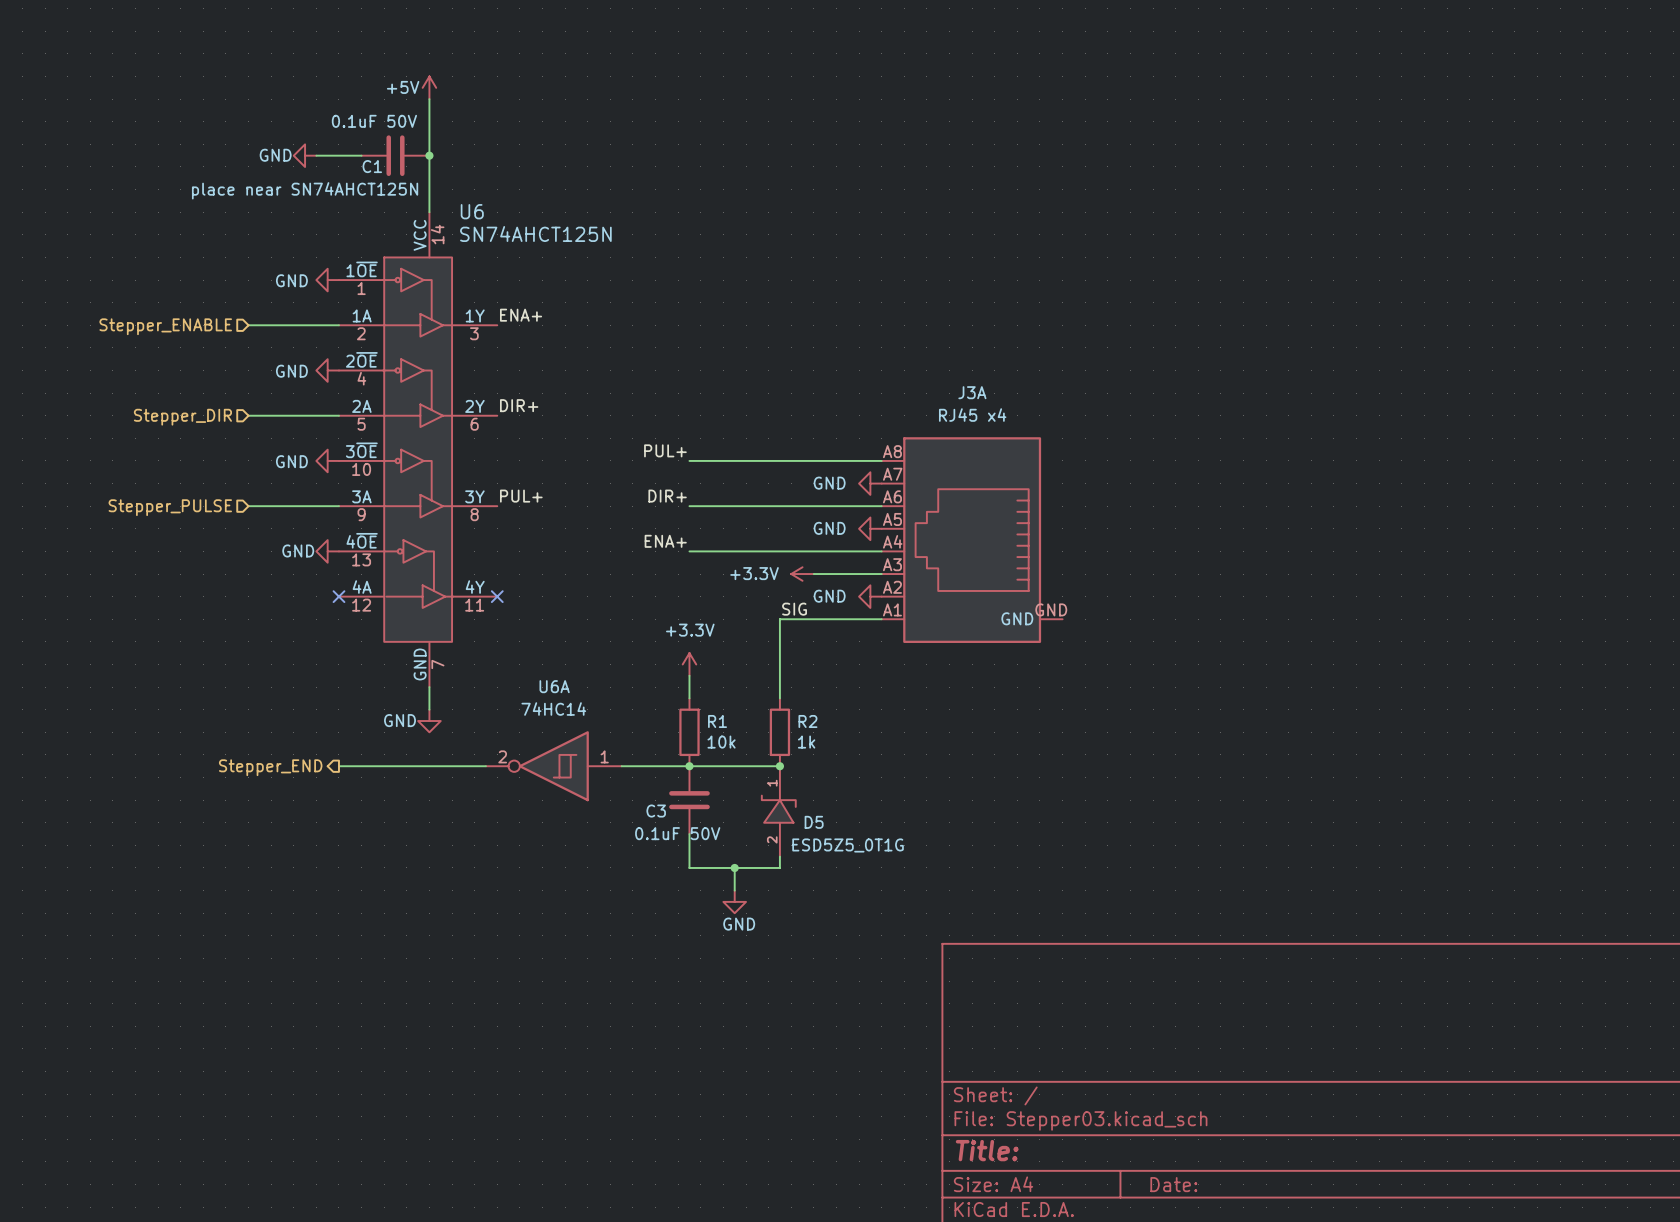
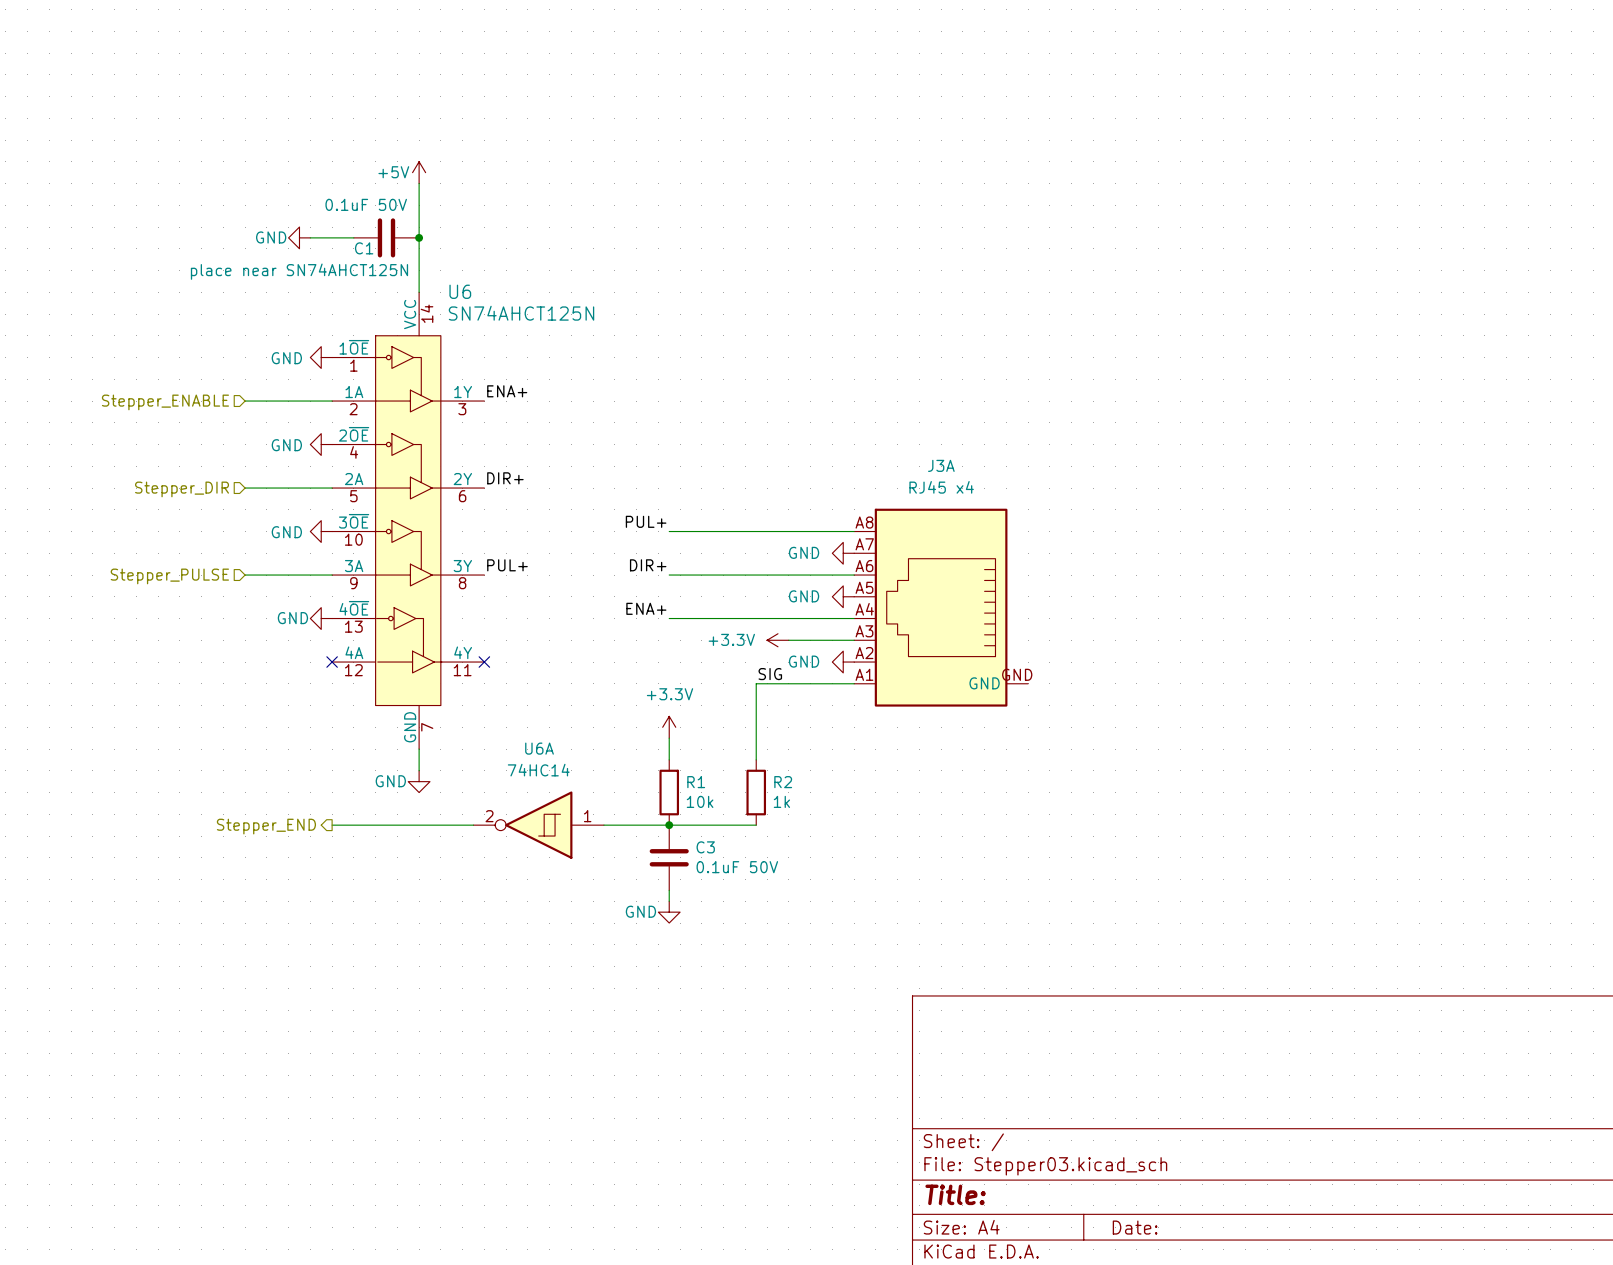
junction: (779, 766) -> none
C3 name position: C3 (656, 811) -> C3 (705, 847)
D5: ESD5Z5_0T1G (778, 811) -> none
C3 value position: 0.1uF 50V (677, 833) -> 0.1uF 50V (737, 867)
wire: (689, 845) (689, 867) (779, 867) (779, 856) -> none
wire: (734, 867) (734, 890) -> none
junction: (734, 867) -> none
power symbol position: GND (734, 901) -> GND (669, 912)
power symbol text position: GND (739, 924) -> GND (640, 911)

